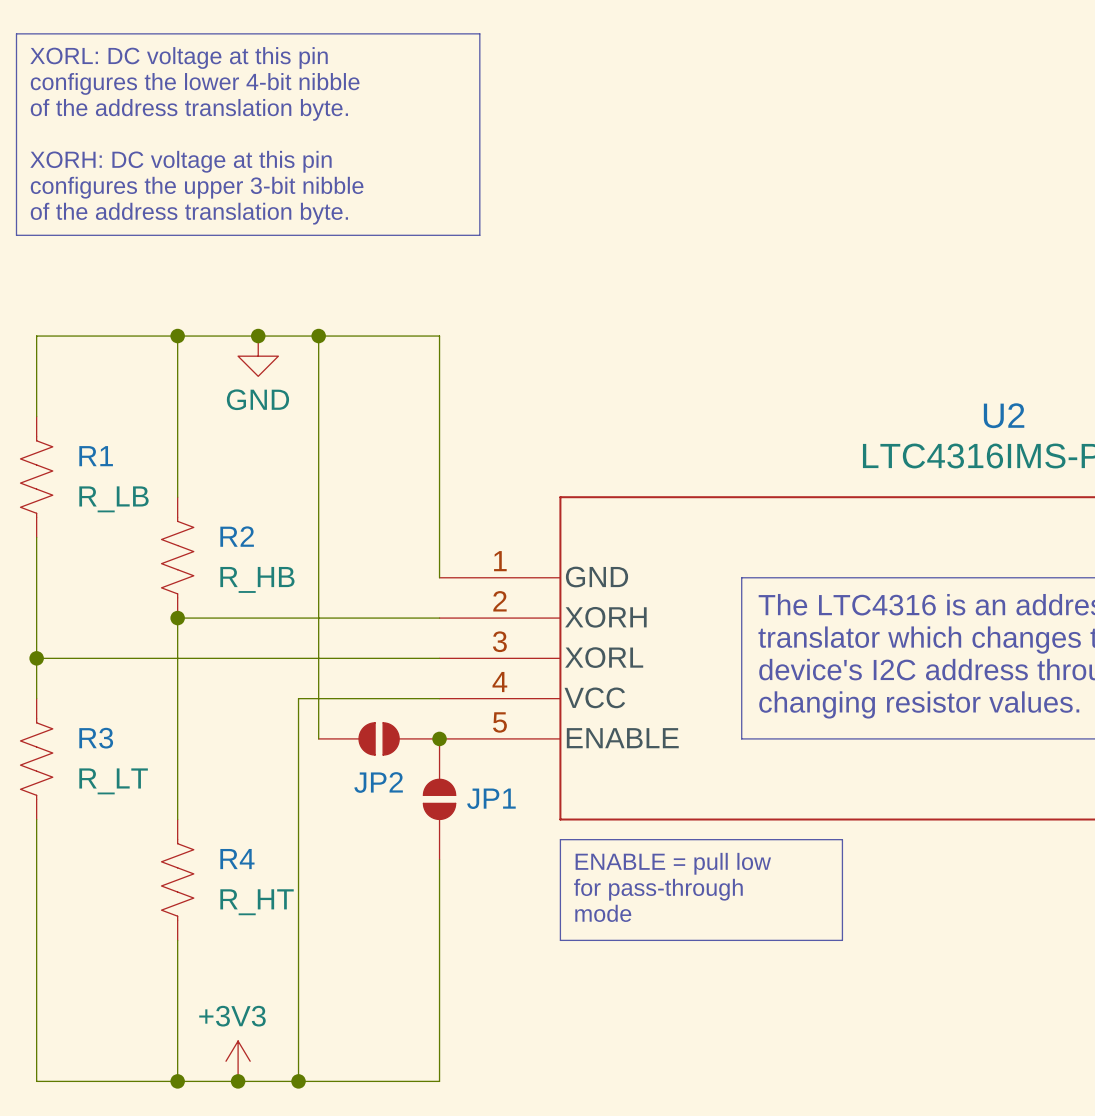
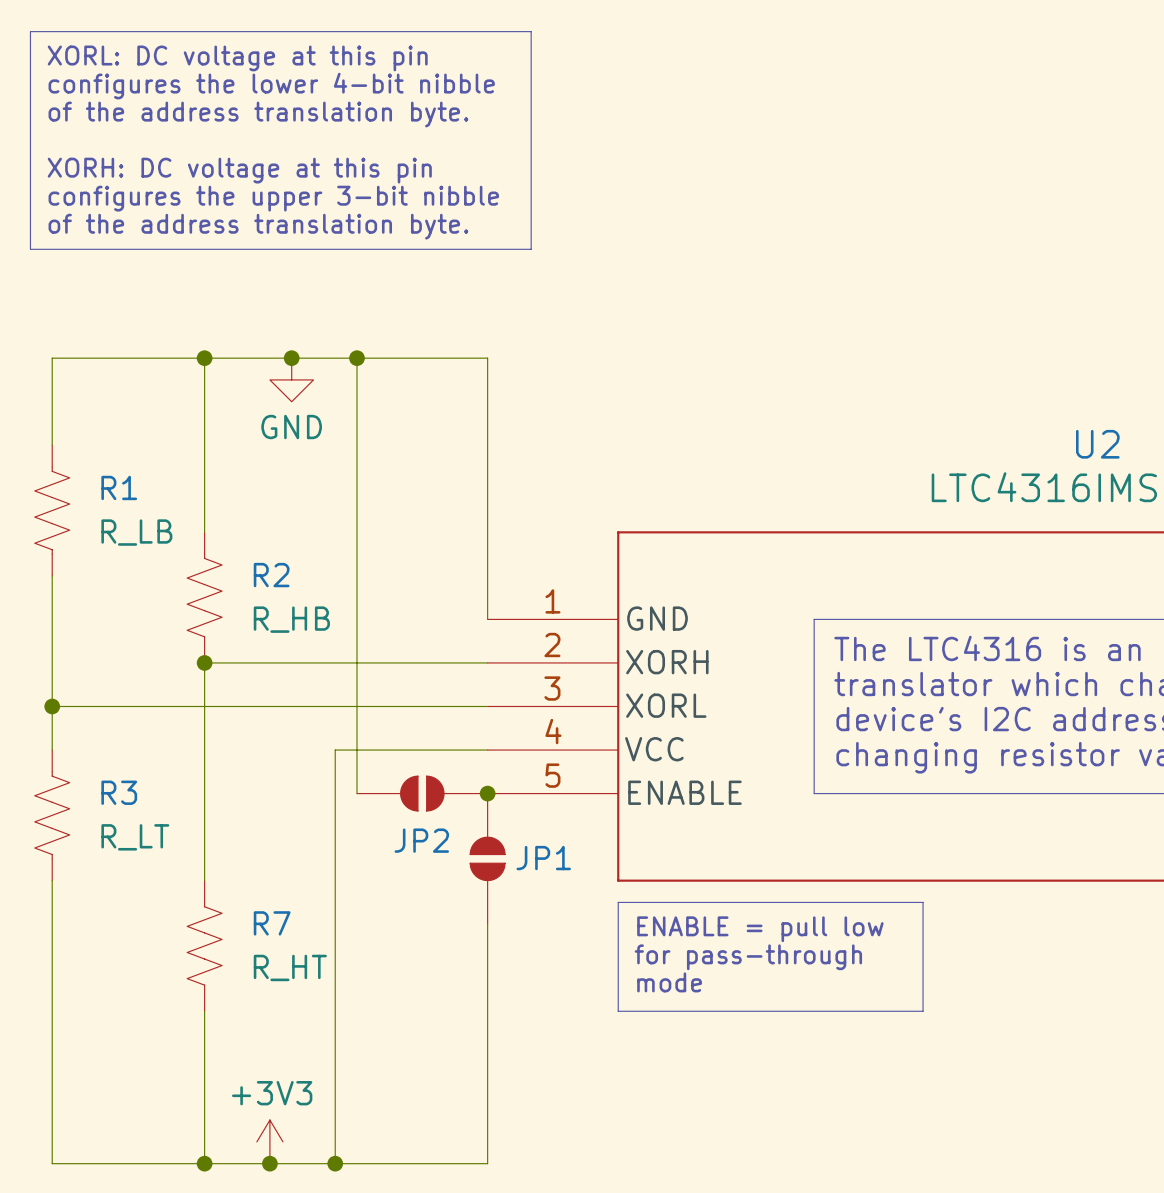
R4 name: R4 (237, 859) -> R7 (272, 923)

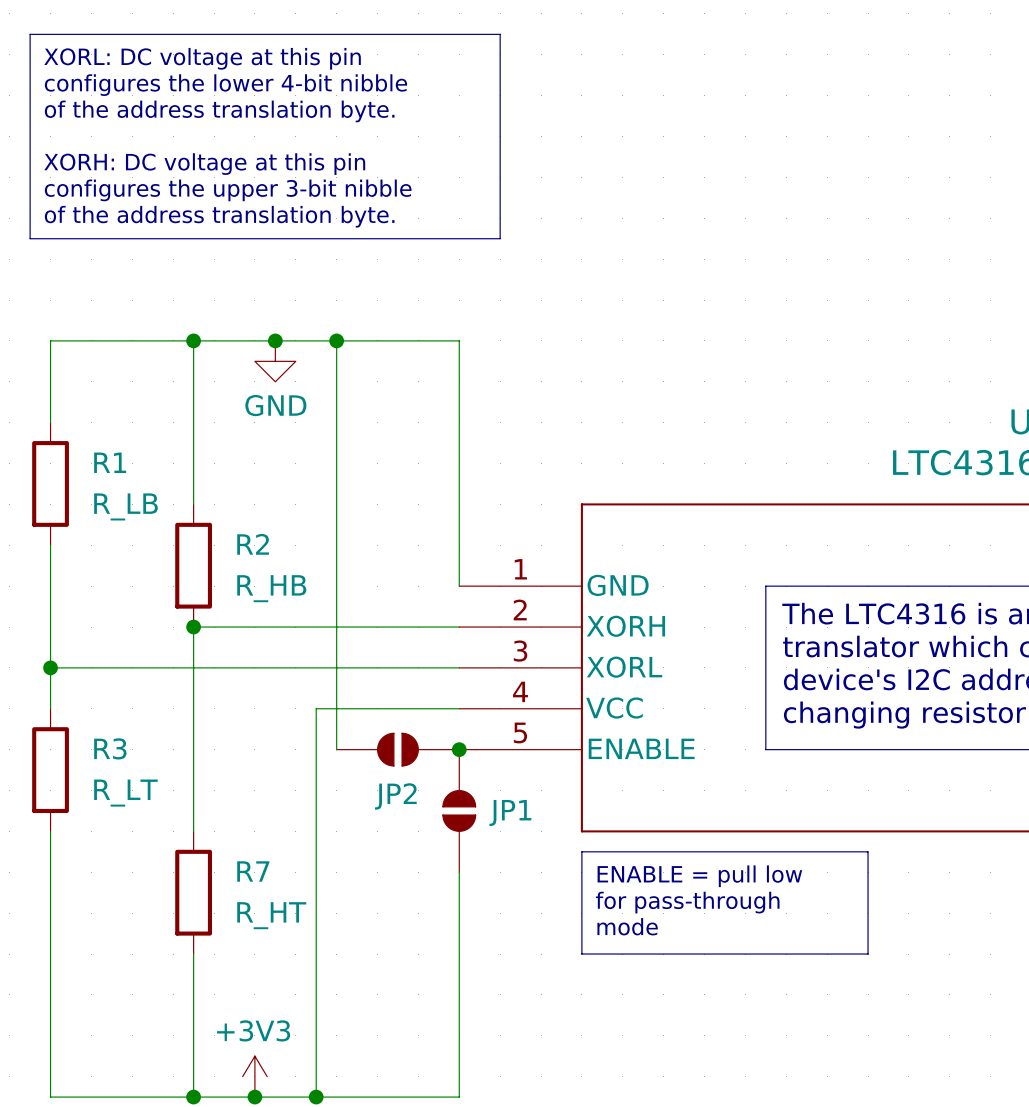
R1 symbol: [34, 445, 70, 576] -> [32, 422, 69, 546]
R2 symbol: [187, 532, 223, 663] -> [175, 504, 213, 628]
R3 symbol: [34, 750, 70, 881] -> [32, 708, 69, 832]
R7 symbol: [187, 880, 223, 1012] -> [175, 831, 213, 955]

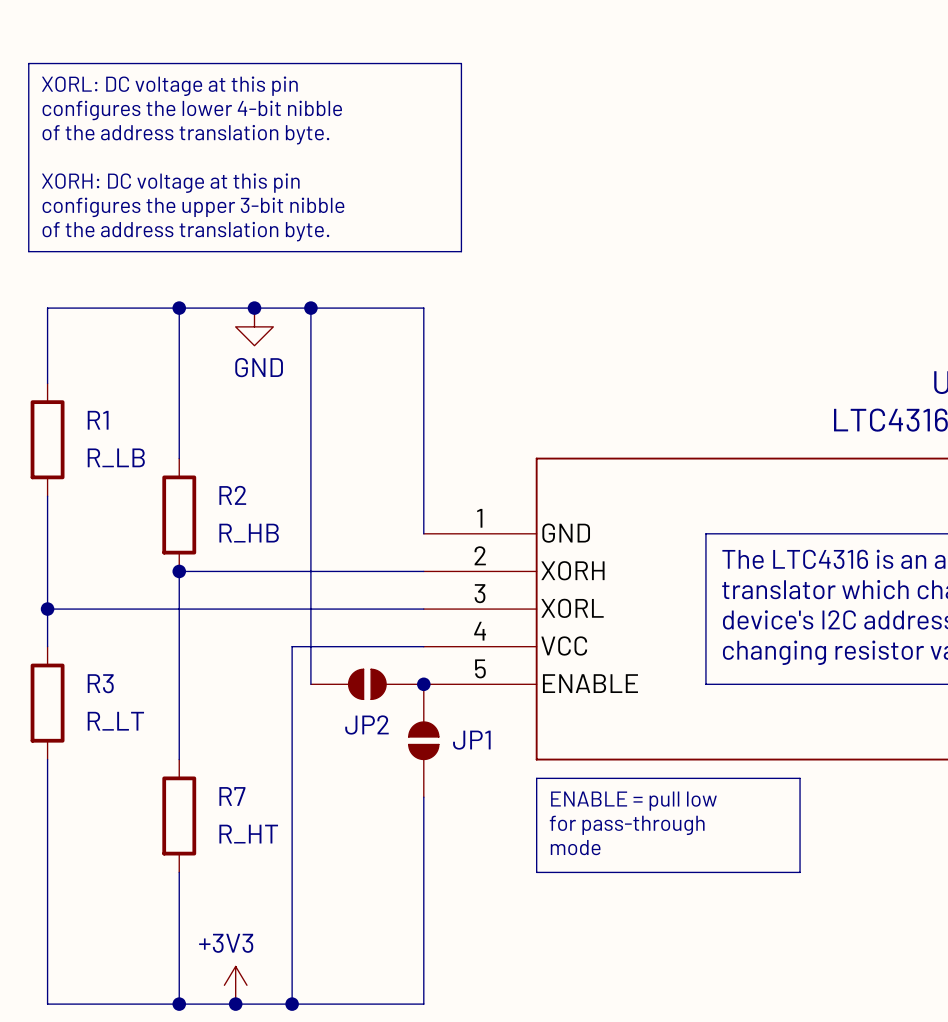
text position: XORL: DC voltage at this pin (202, 58) -> XORL: DC voltage at this pin (169, 86)
line: (30, 75) (30, 34) (500, 34) (500, 75) -> (28, 63) (461, 63)
text position: configures the lower 4-bit nibble (225, 85) -> configures the lower 4-bit nibble (192, 110)
text: of the address translation byte. (219, 111) -> none
text: XORH: DC voltage at this pin (204, 164) -> of the address translation byte. (185, 134)
text position: configures the upper 3-bit nibble (228, 190) -> configures the upper 3-bit nibble (193, 207)
text: none -> XORH: DC voltage at this pin (170, 183)
text position: of the address translation byte. (219, 216) -> of the address translation byte. (185, 231)
line: (30, 238) (500, 238) -> (28, 214) (28, 251) (461, 251) (461, 214)

